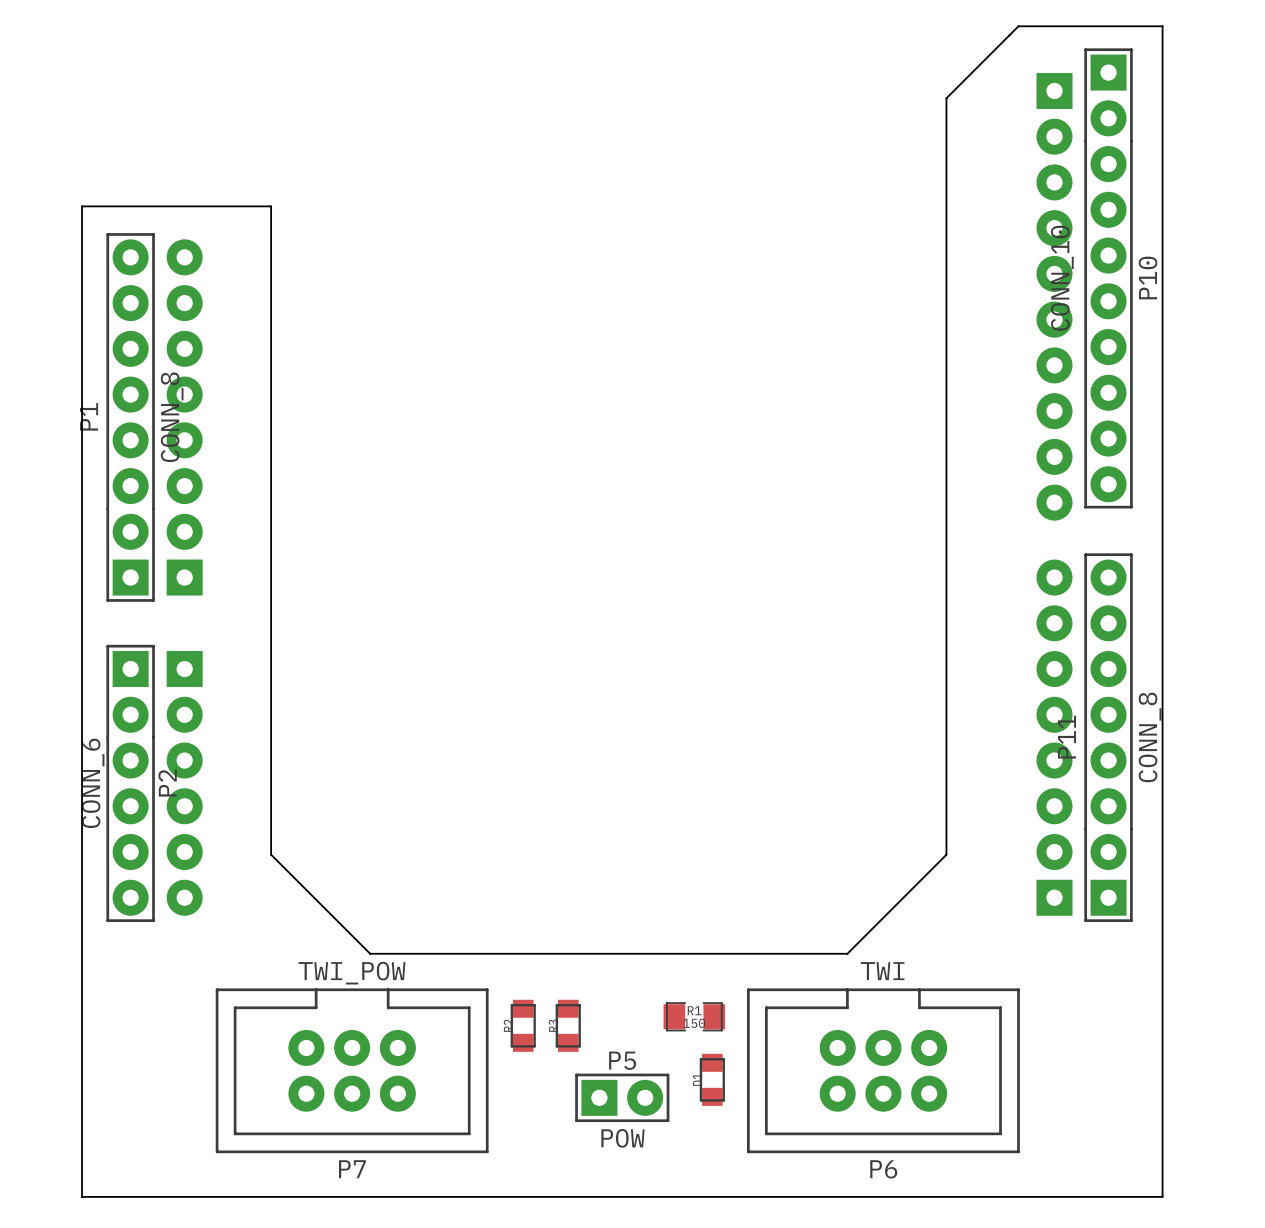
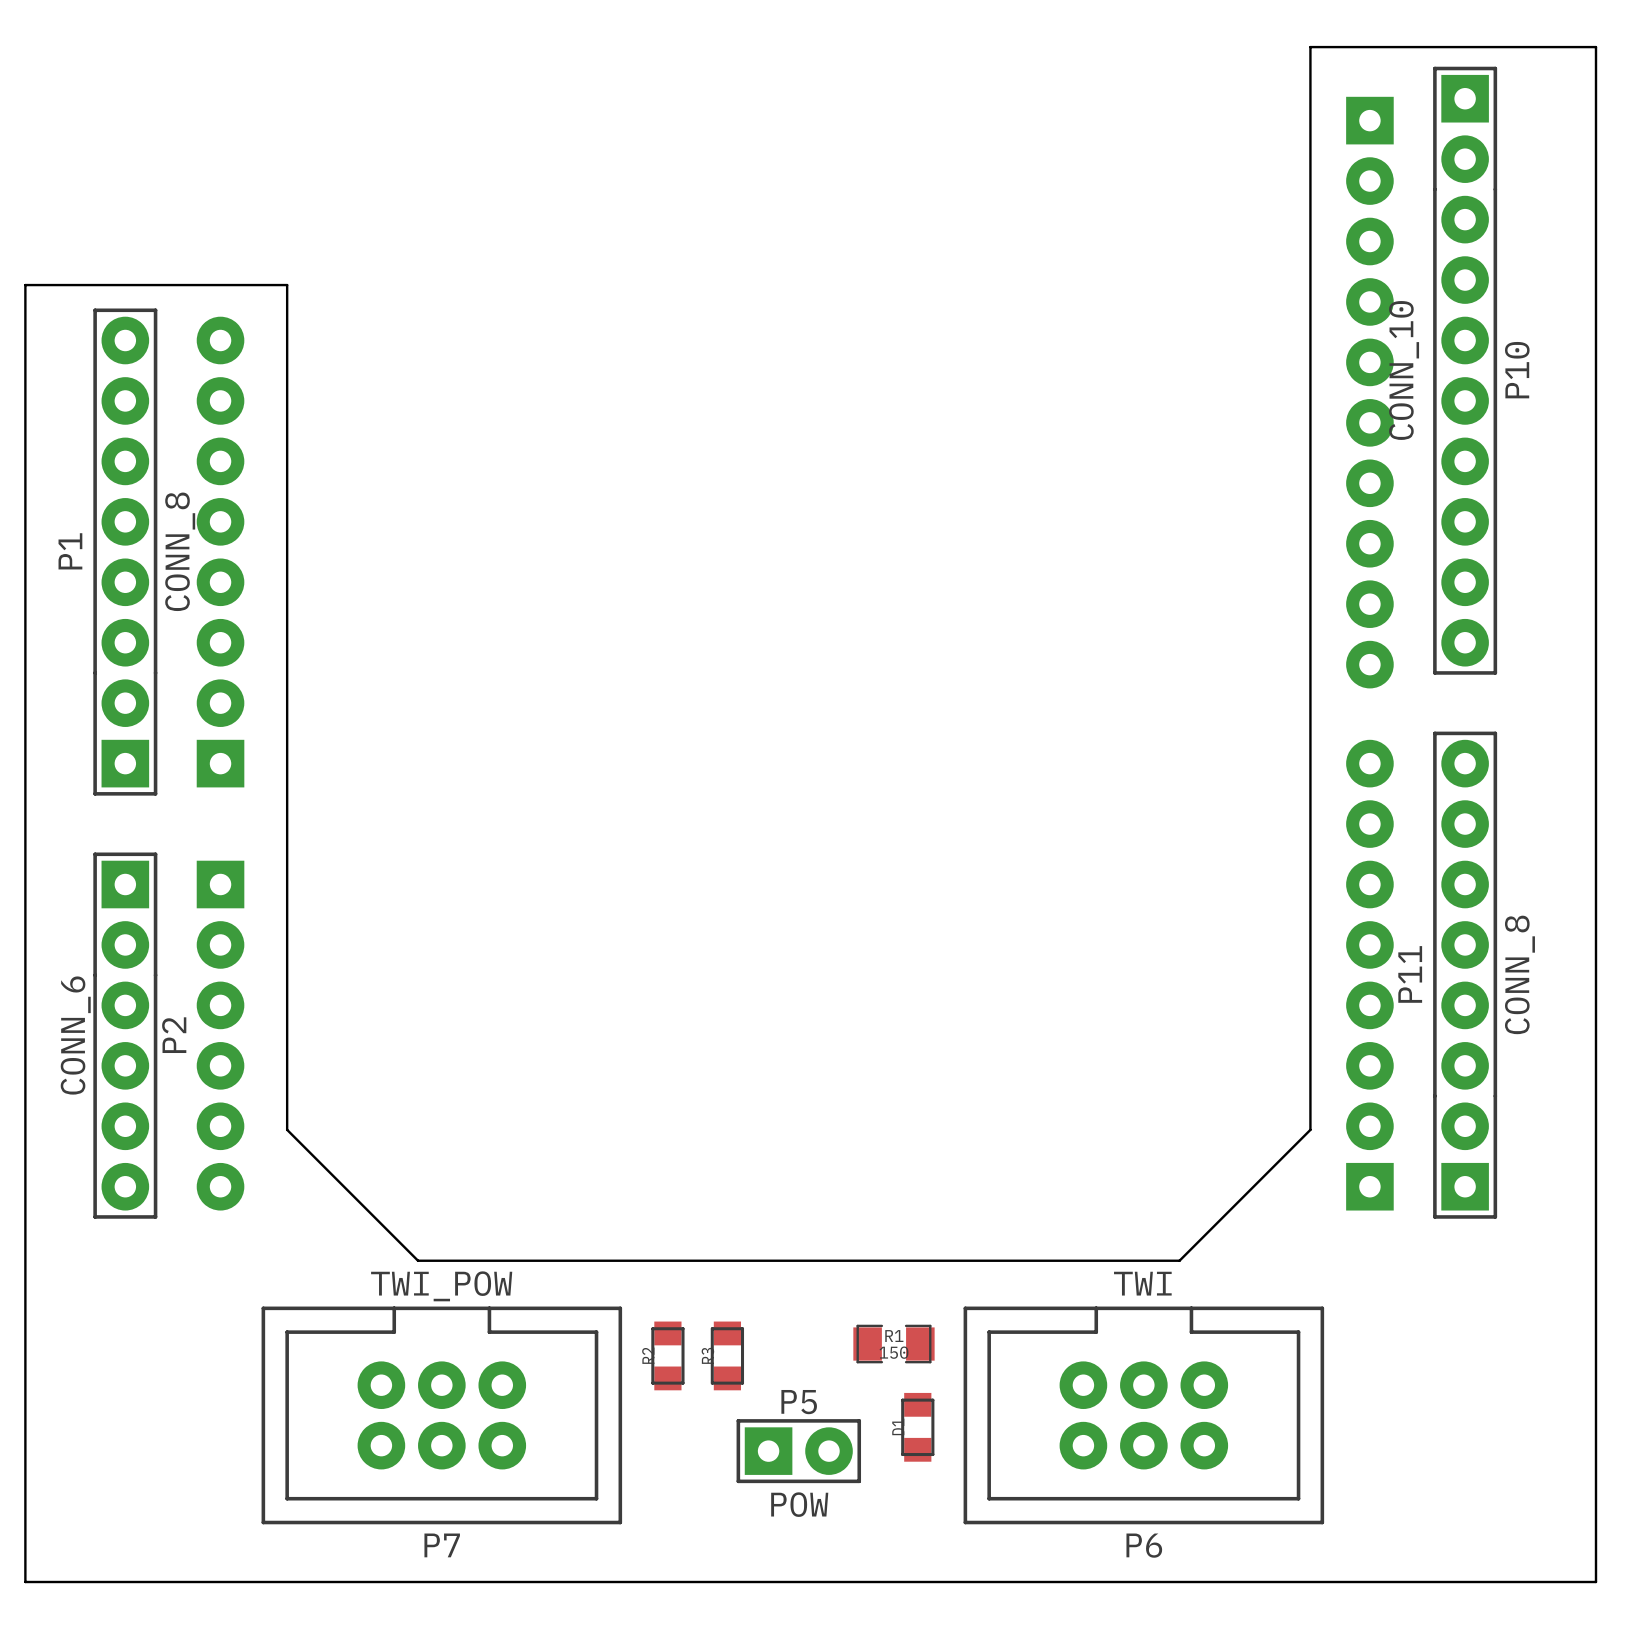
P10 position: (1108, 278) -> (1465, 370)
P1 position: (130, 417) -> (125, 552)
P11 position: (1108, 737) -> (1465, 975)
P2 position: (130, 783) -> (125, 1035)
board edge: (370, 953) (271, 854) (271, 206) (82, 206) (82, 1196) -> (465, 1260) (418, 1260) (287, 1129) (287, 285) (25, 285) (25, 1582) (84, 1582)
board edge: (847, 953) (946, 854) (946, 98) (1018, 26) (1162, 26) (1162, 1196) -> (1096, 1260) (1179, 1260) (1310, 1129) (1310, 47) (1596, 47) (1596, 1582) (1512, 1582)

